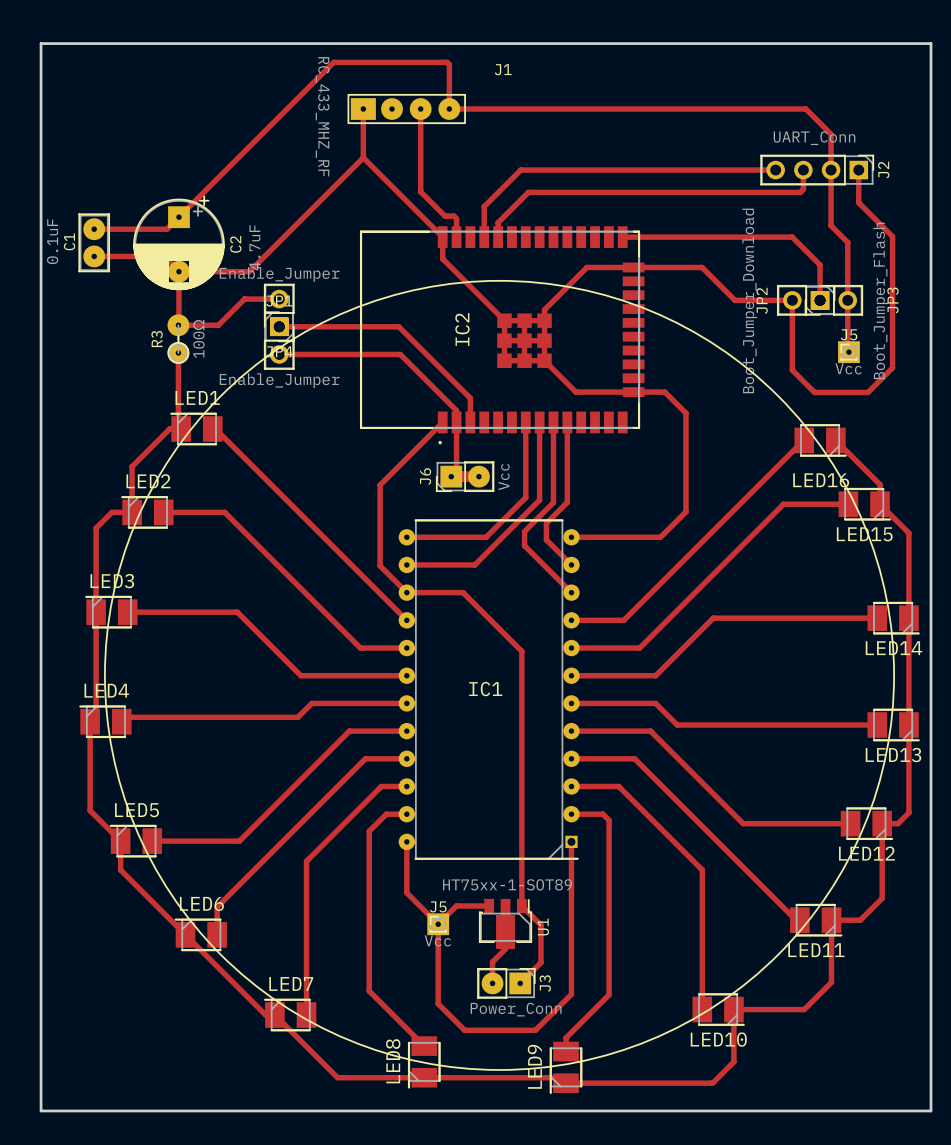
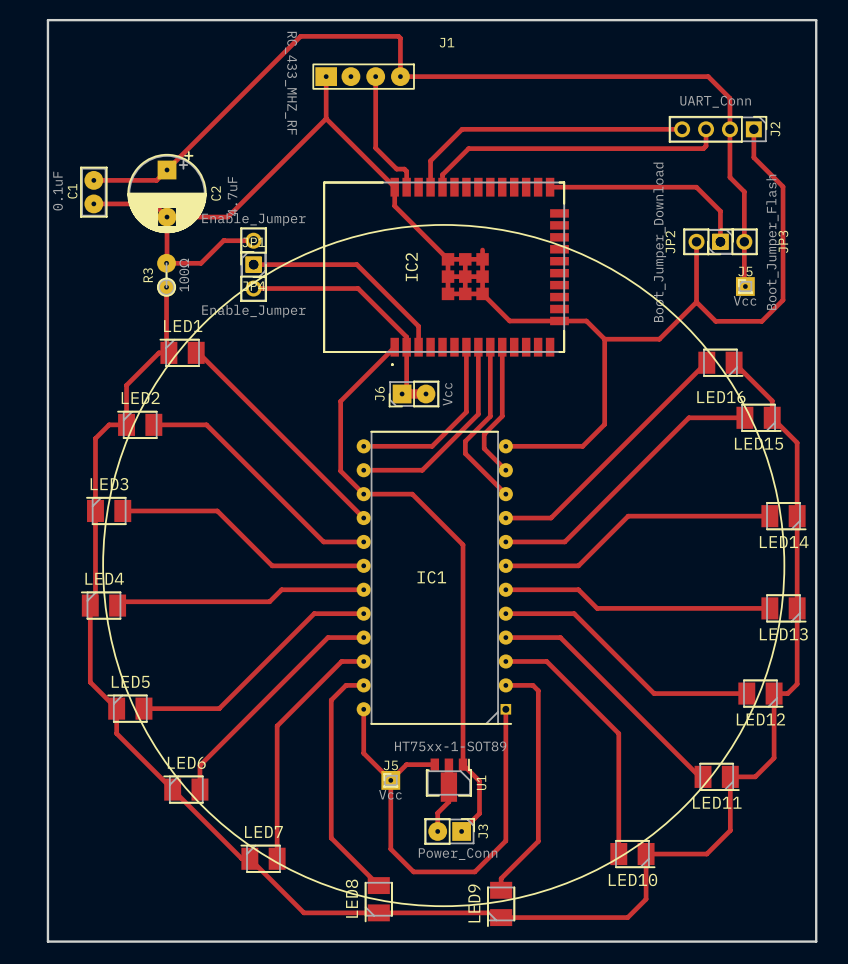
track: (792, 300) (735, 300) (702, 267) (586, 267) (544, 309) -> none
track: none -> (696, 302) (659, 339) (604, 339)

